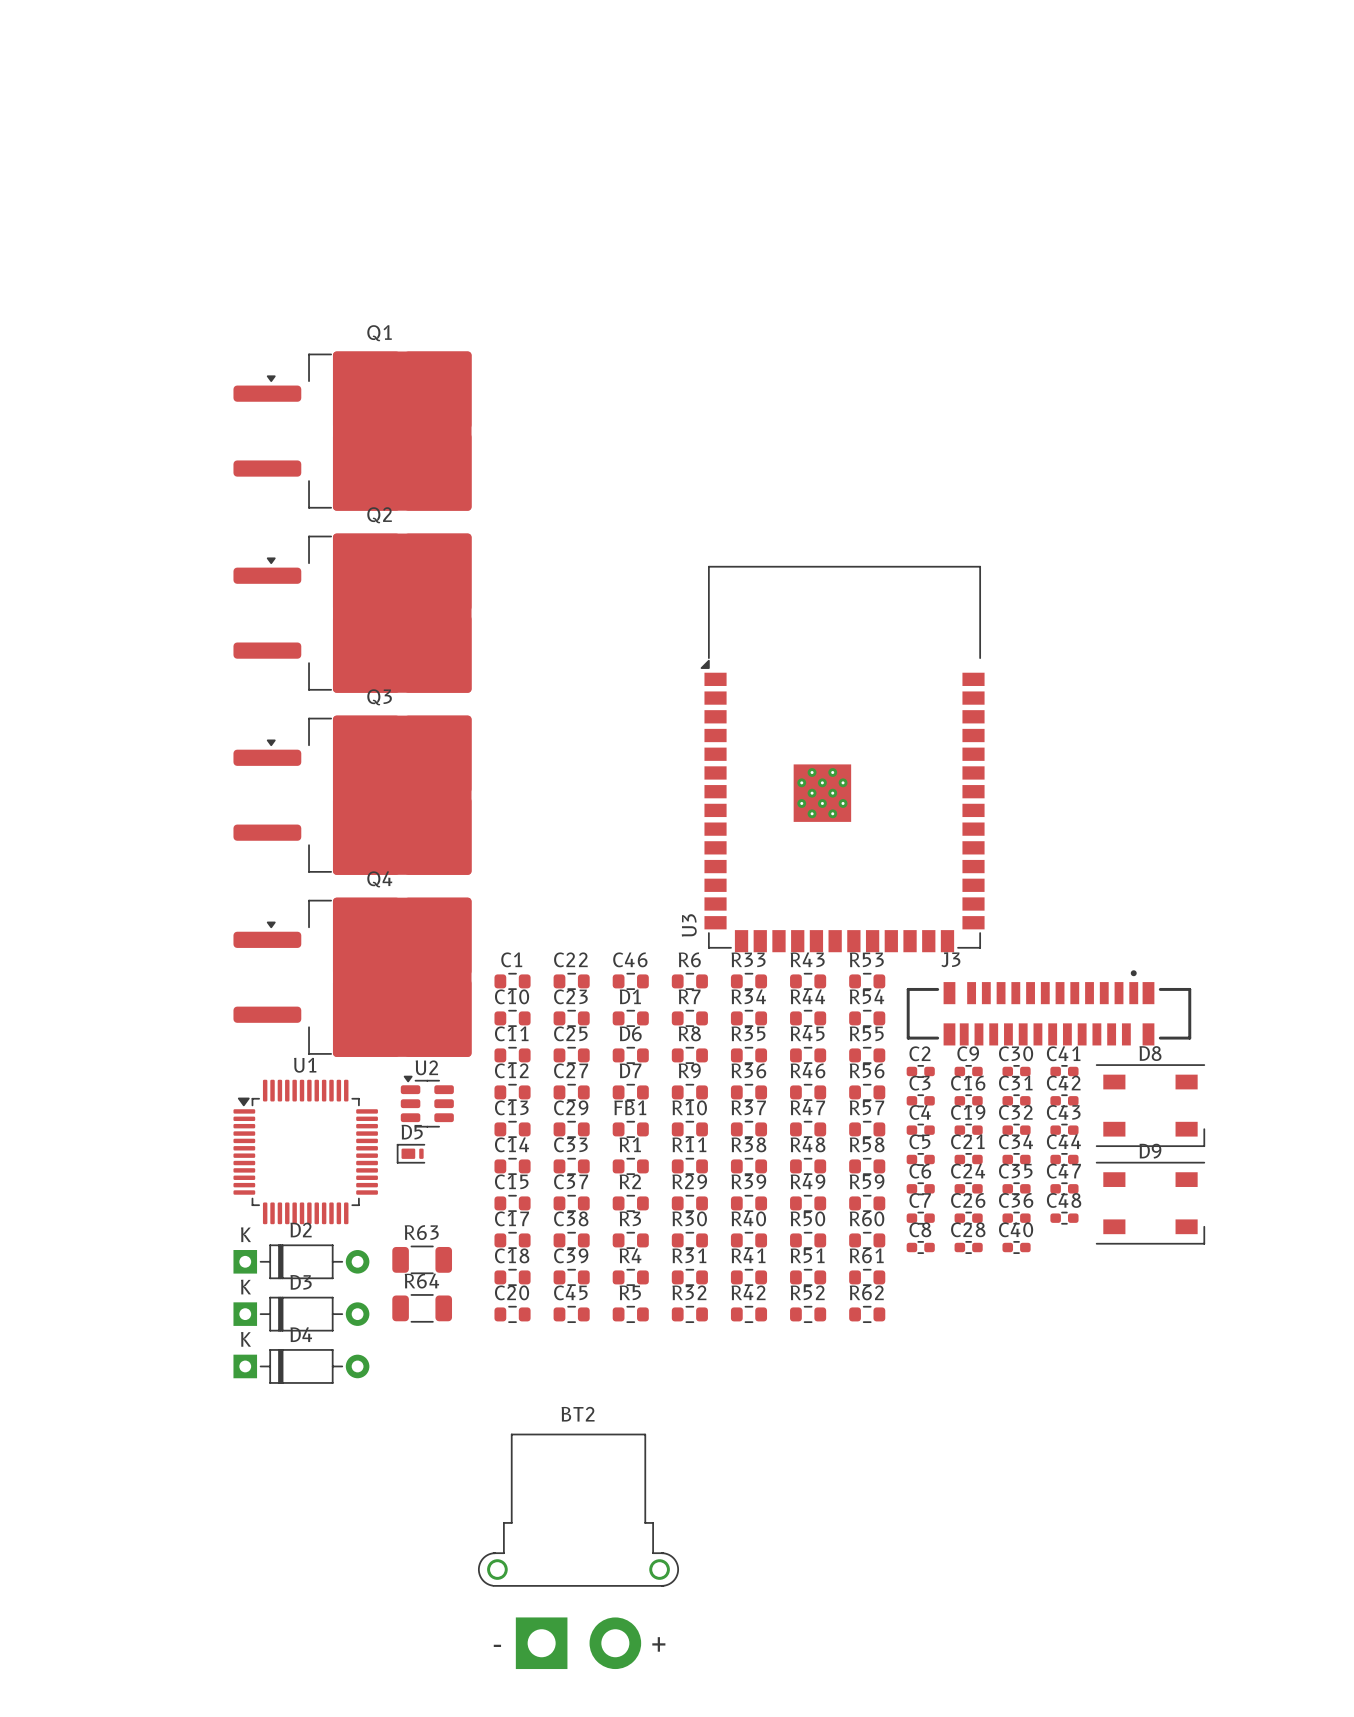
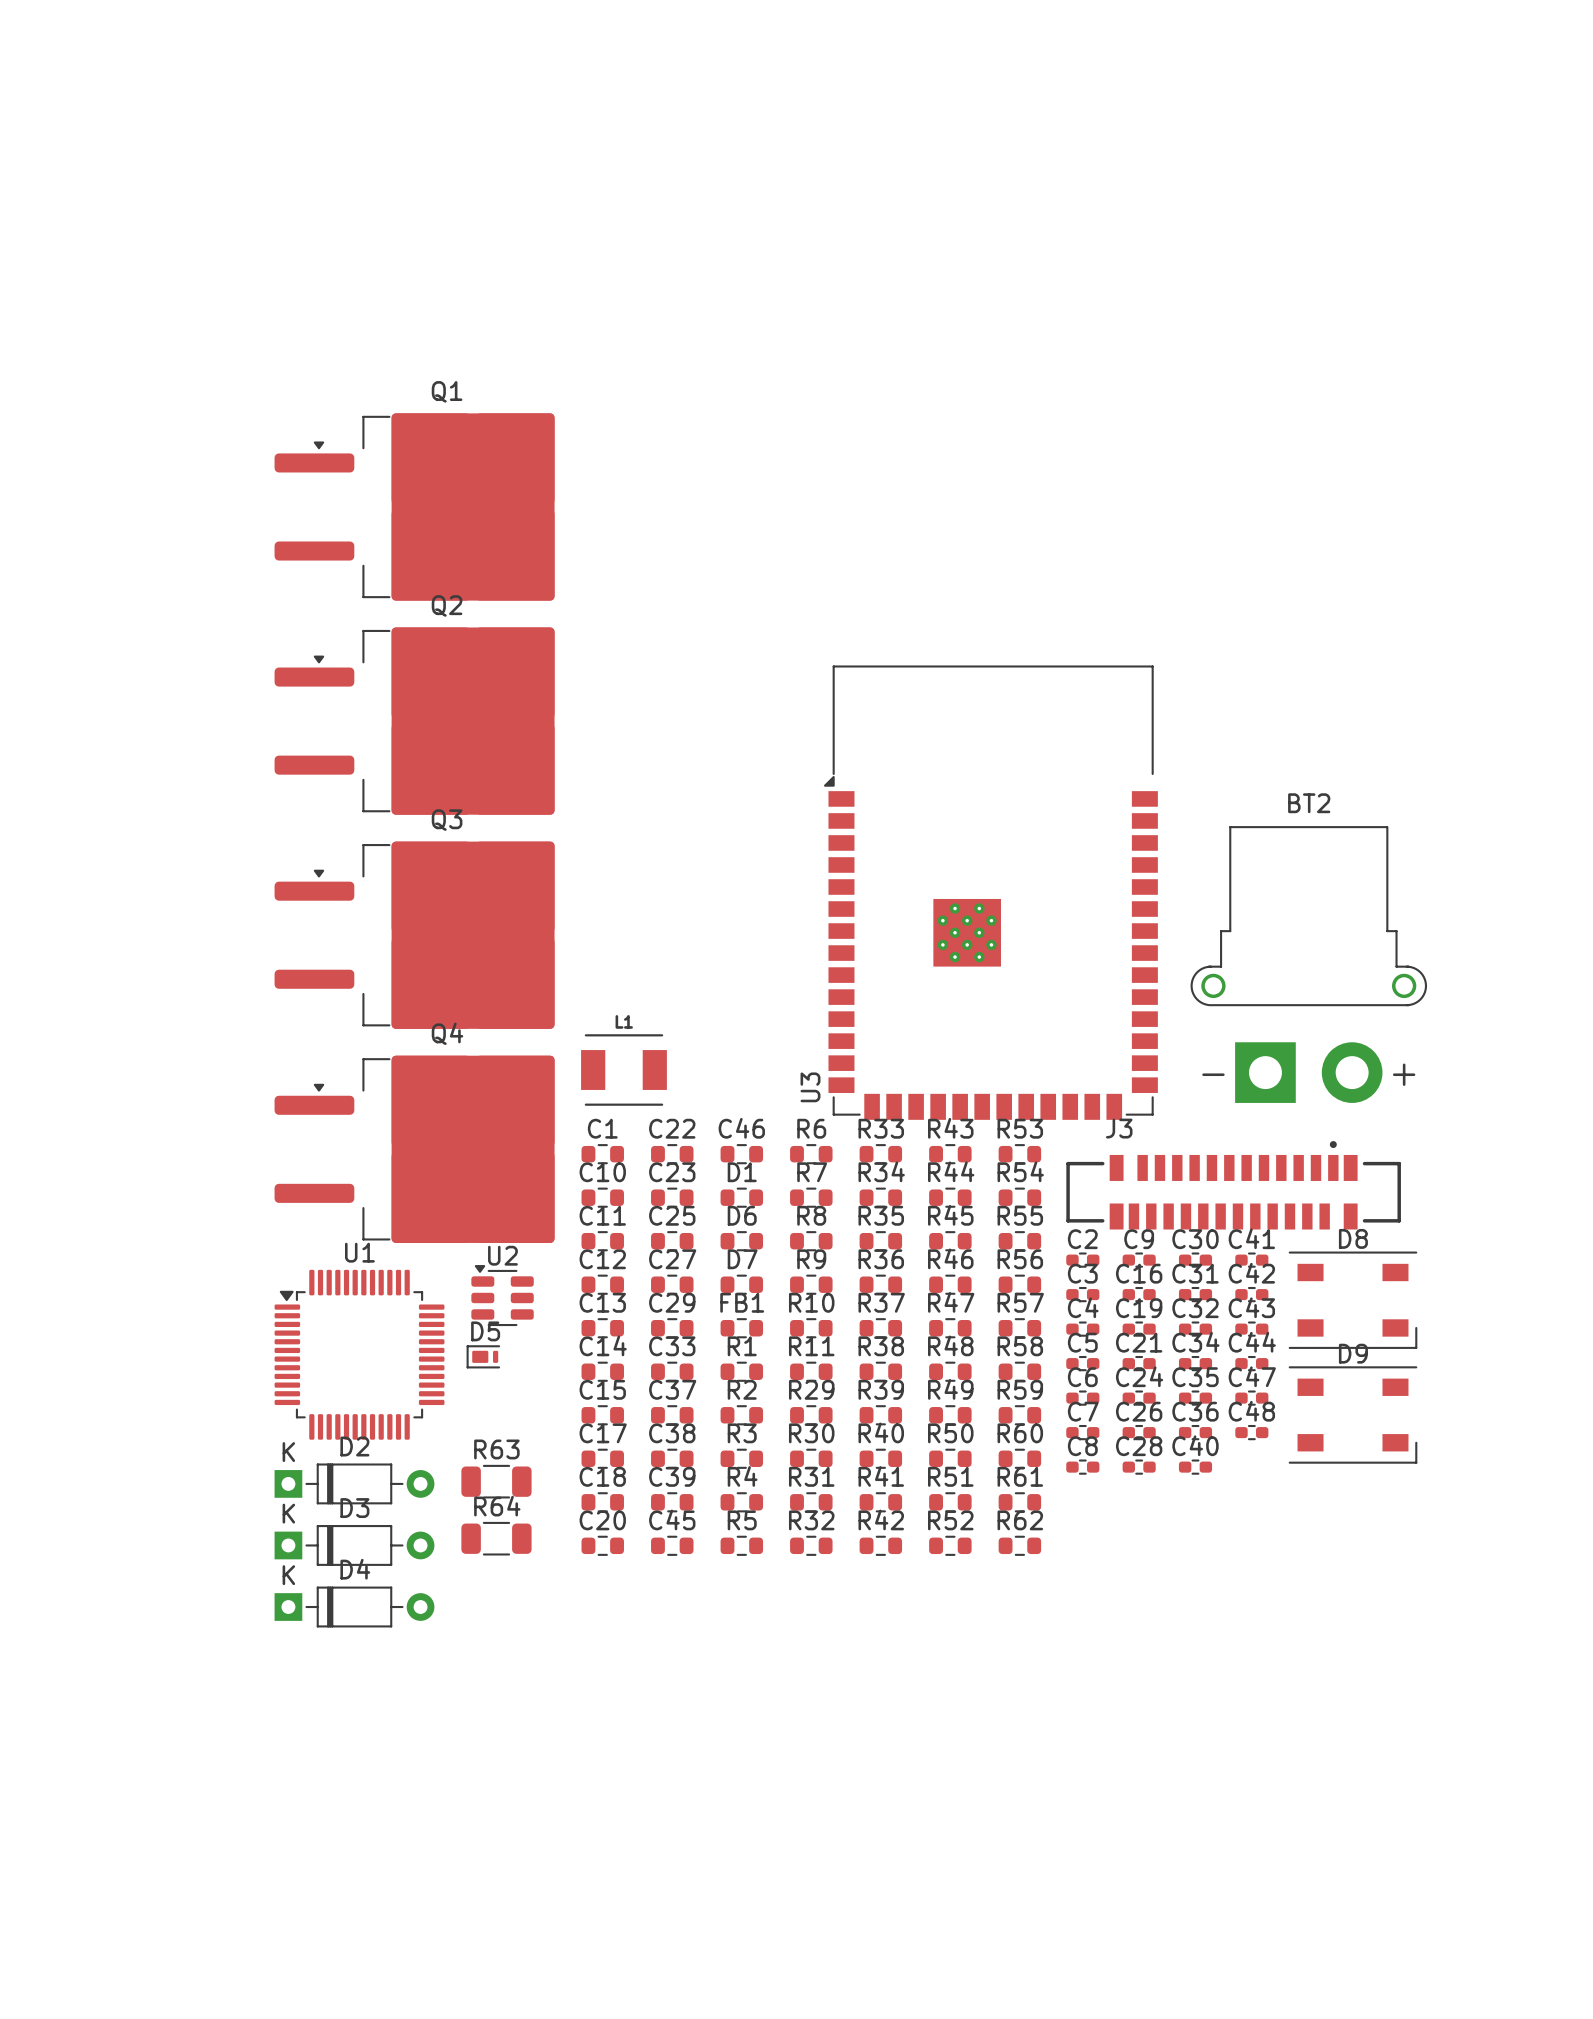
L1: none -> (623, 1070)
BT2 position: (578, 1551) -> (1308, 964)

